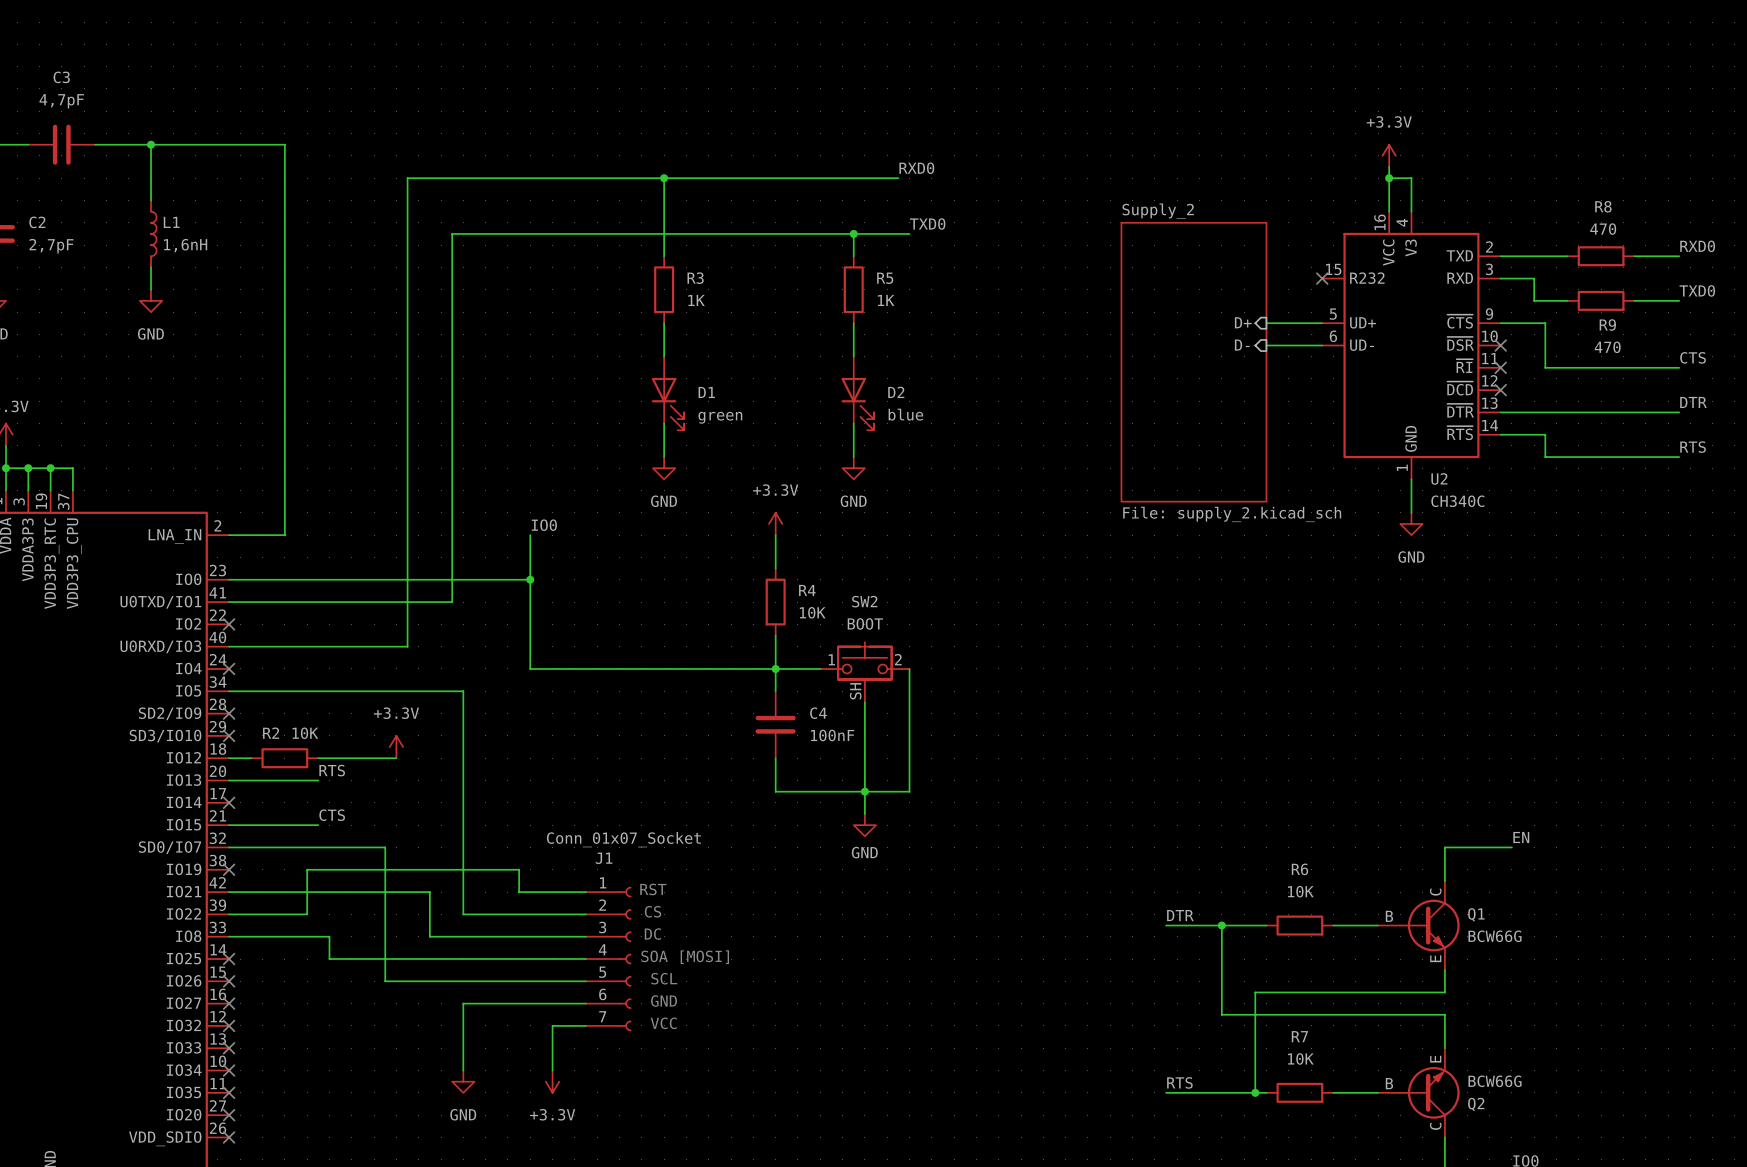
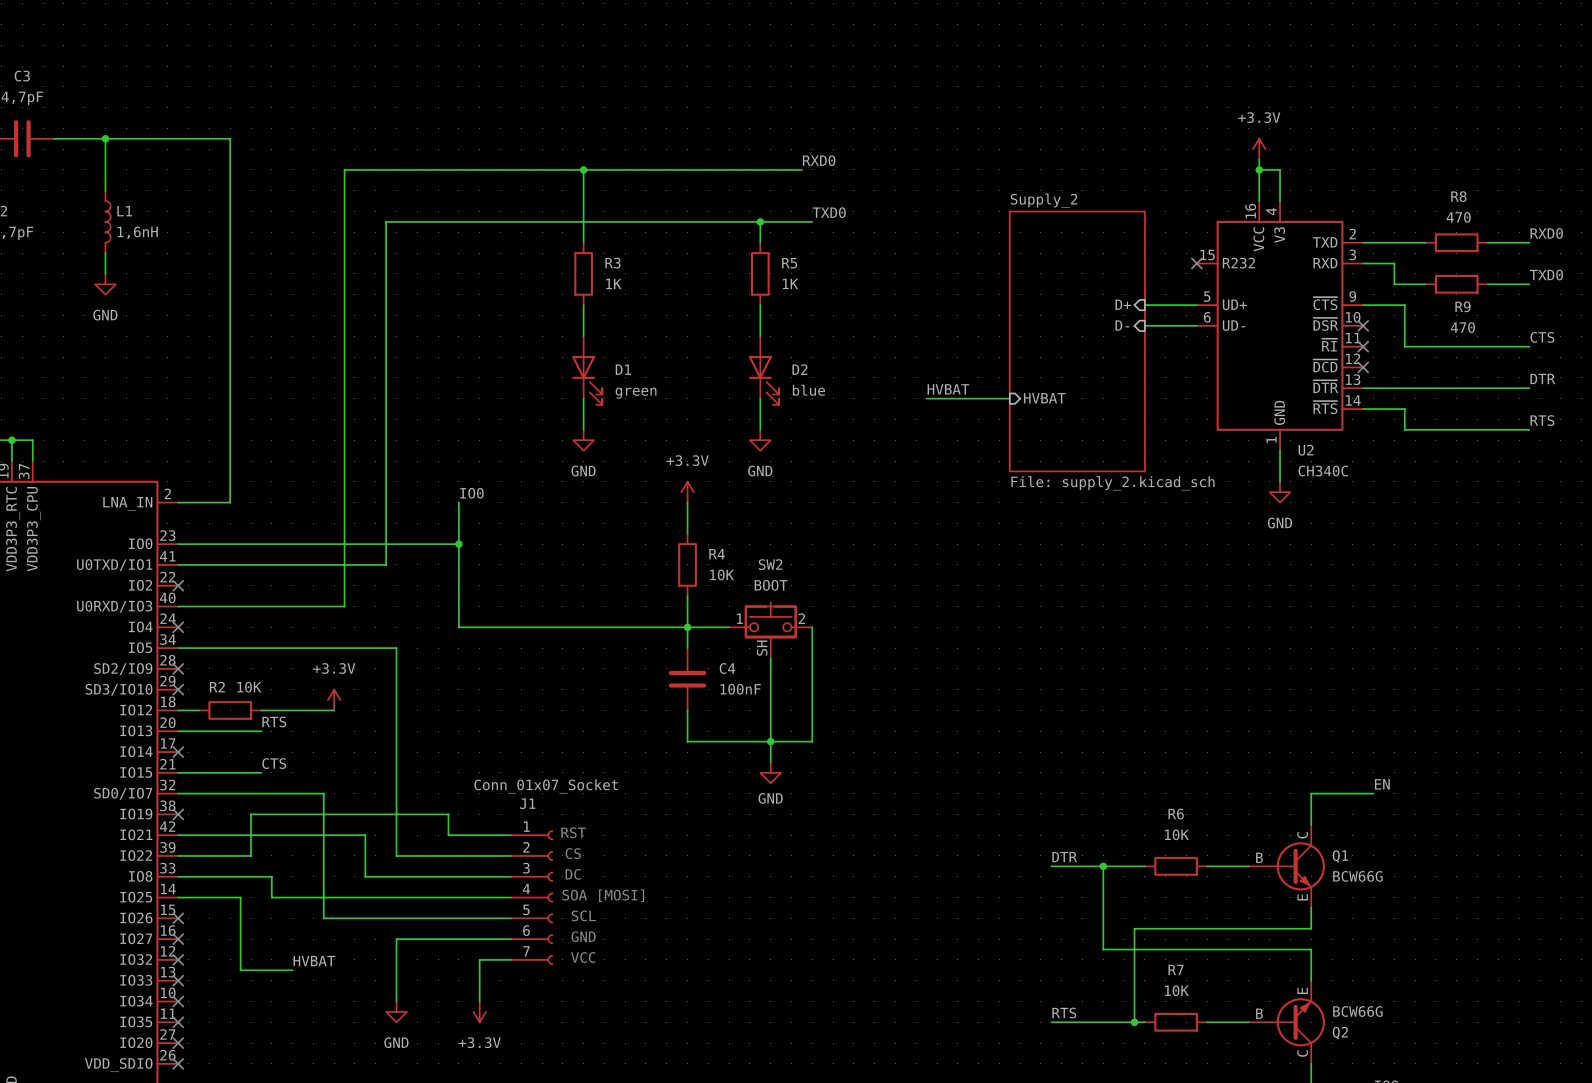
label: none -> HVBAT (948, 389)
wire: none -> (926, 398) (1009, 398)
sheet pin: none -> HVBAT (1044, 398)
wire: none -> (178, 897) (240, 897) (240, 970) (292, 970)
no-connect mark: (229, 959) -> none
label: none -> HVBAT (314, 961)

